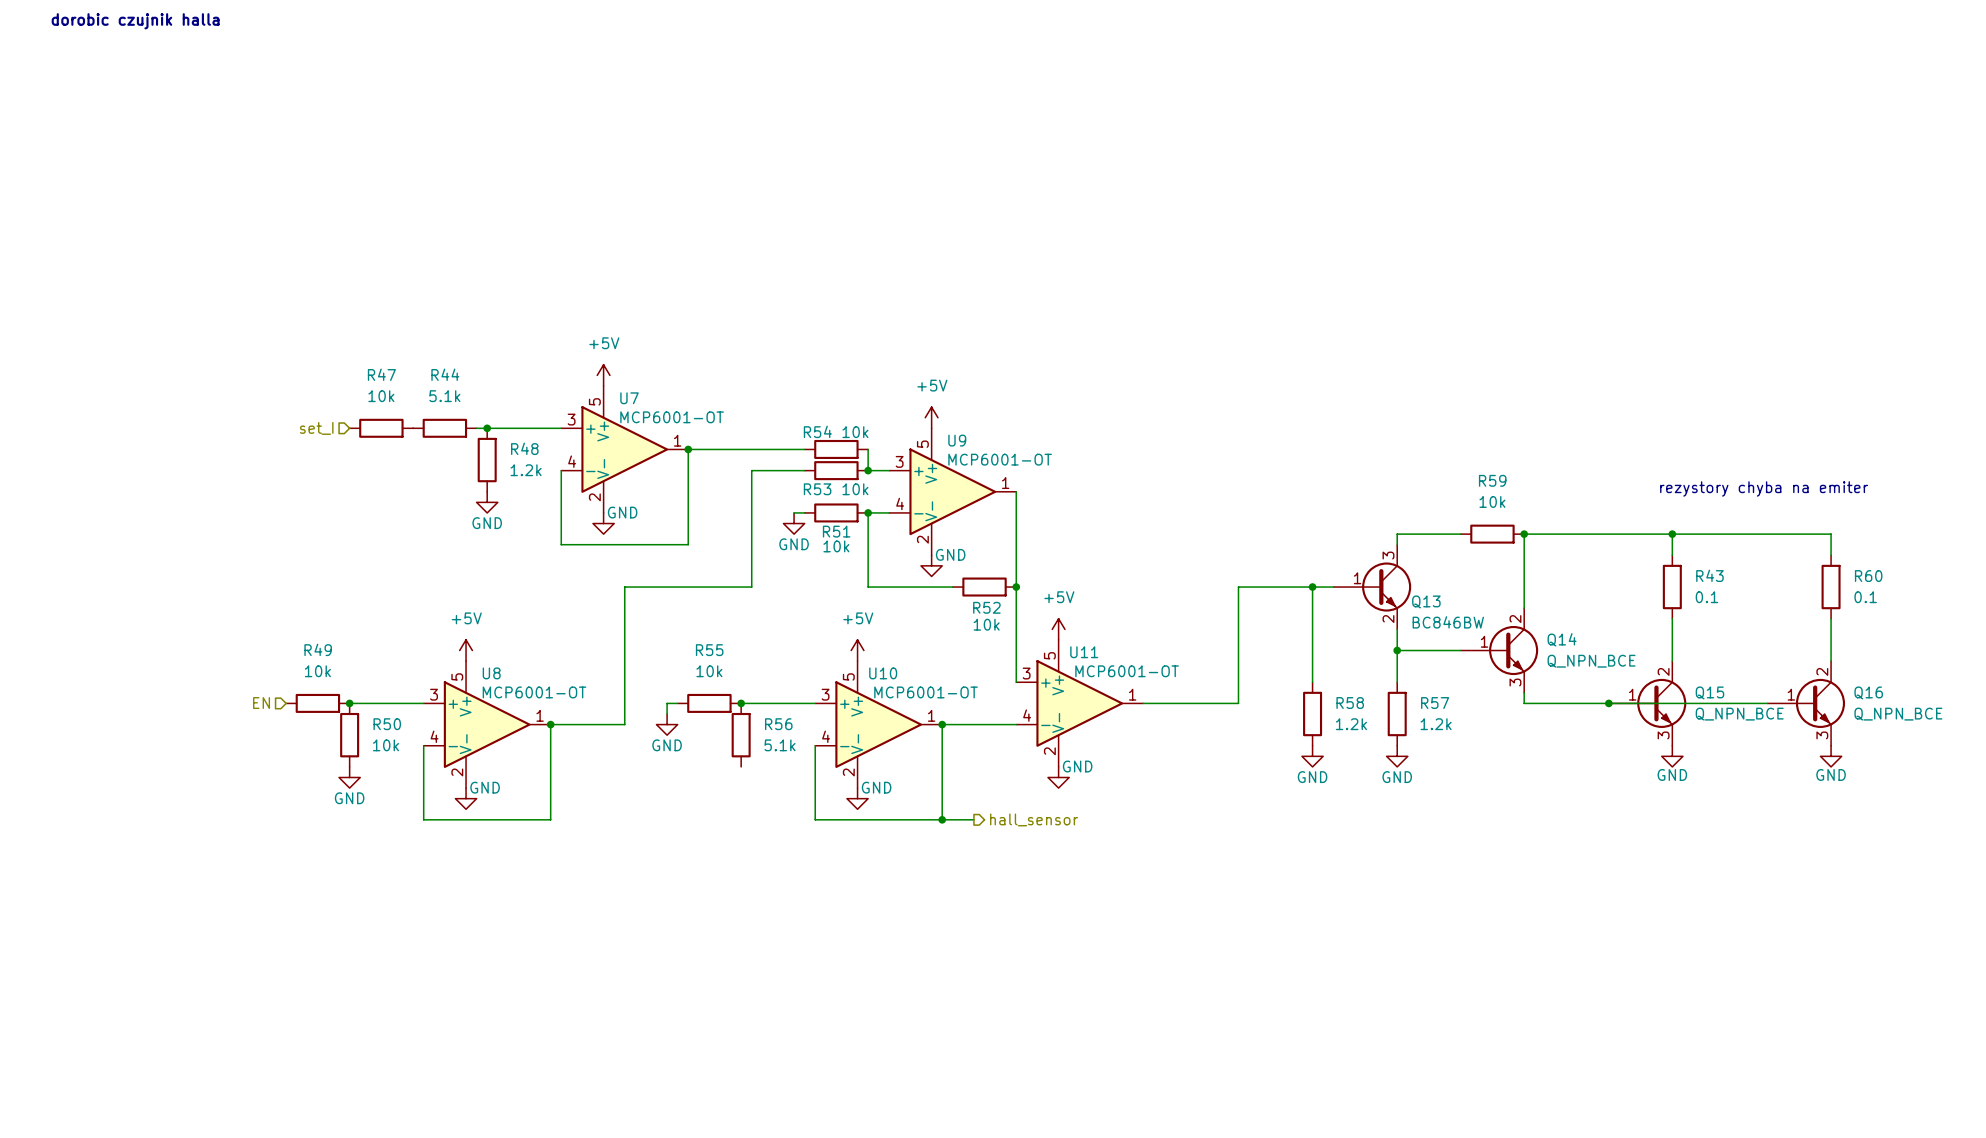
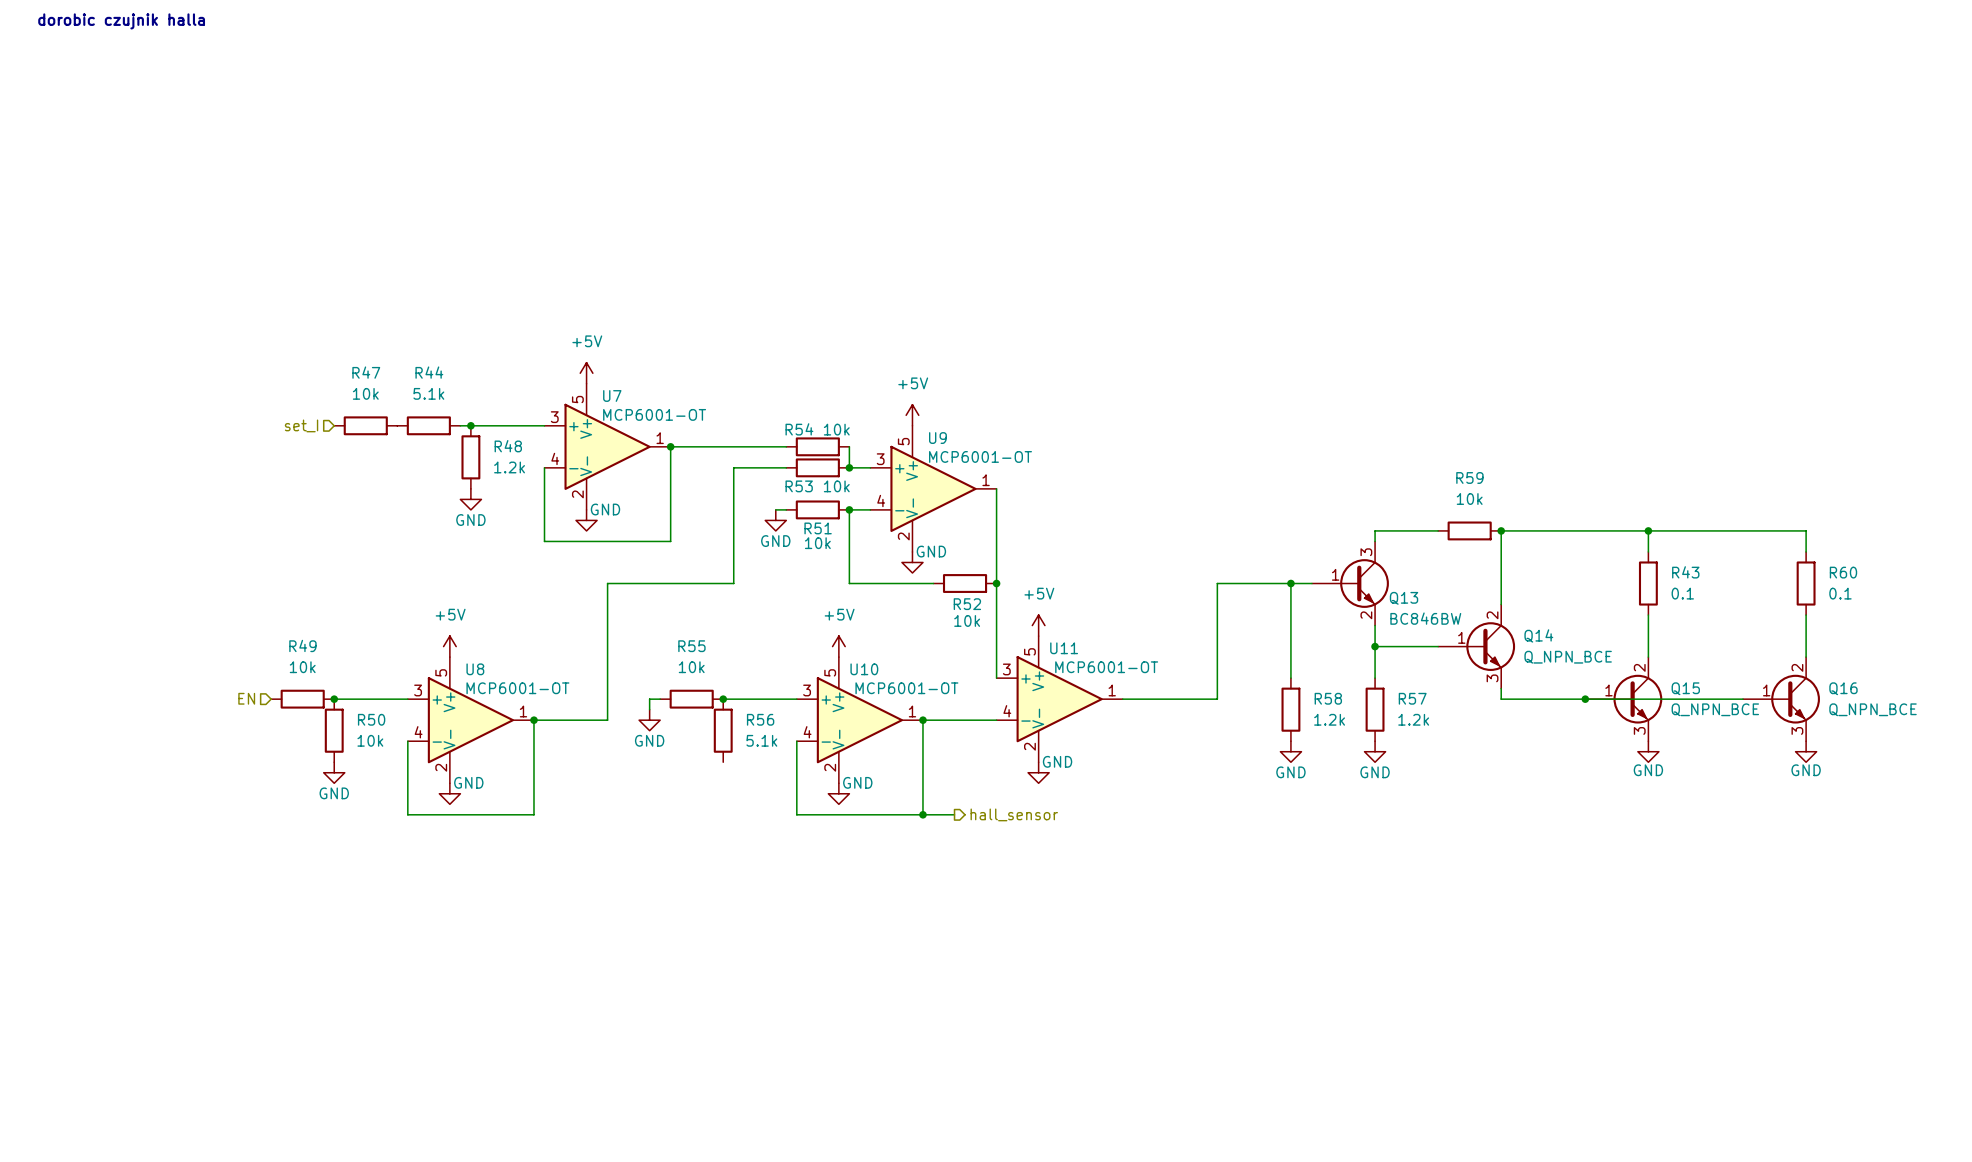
text: rezystory chyba na emiter (1764, 488) -> none

